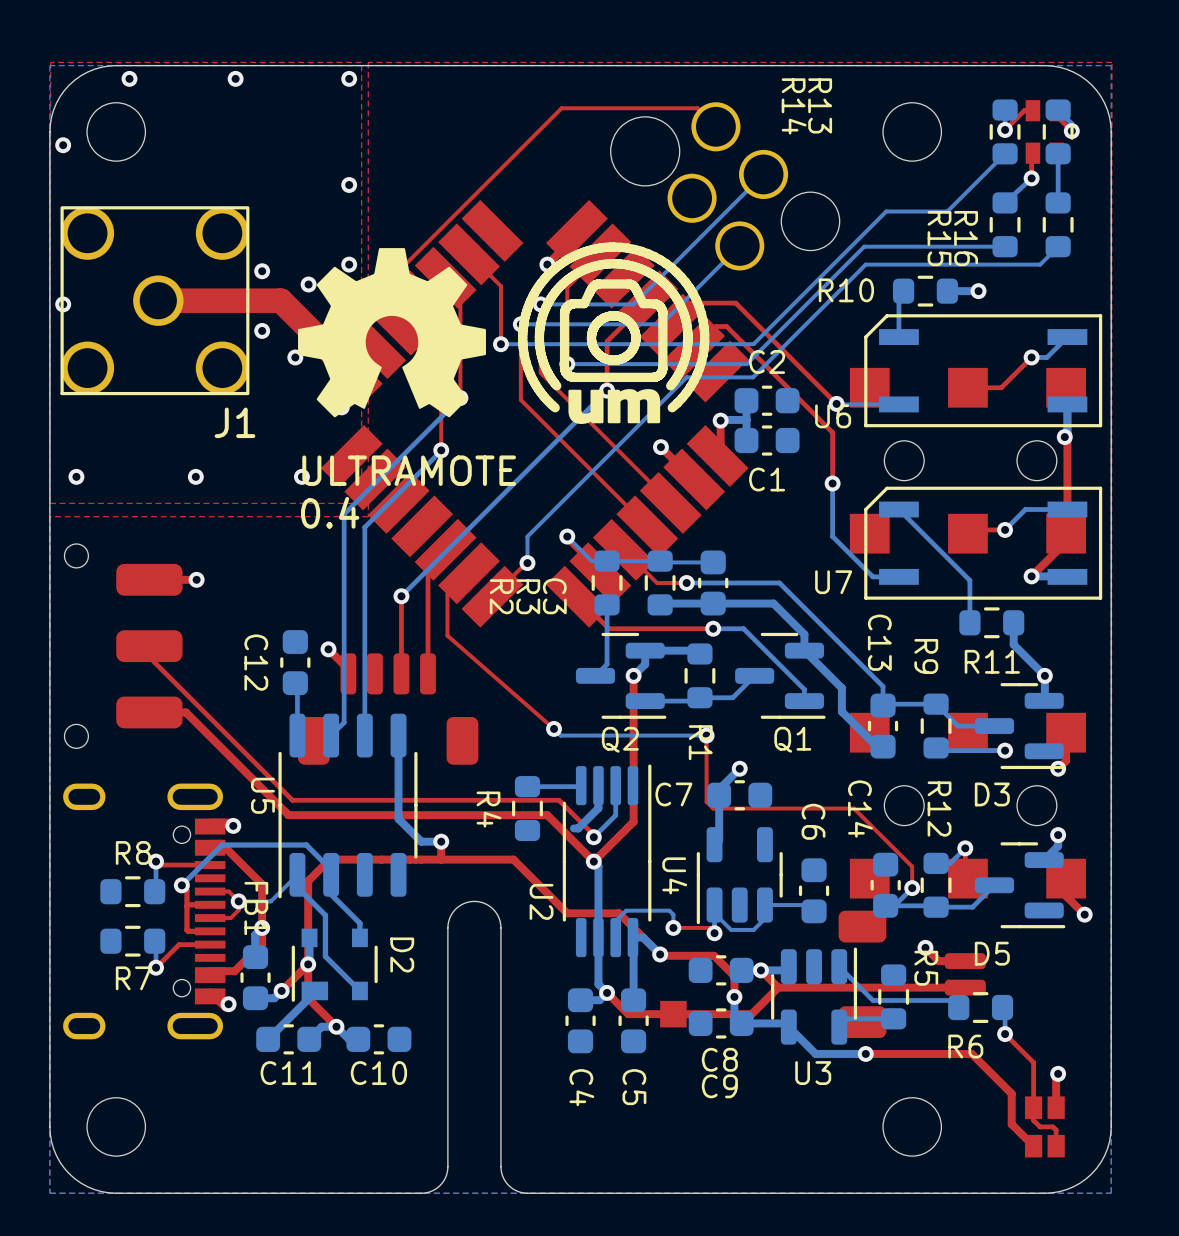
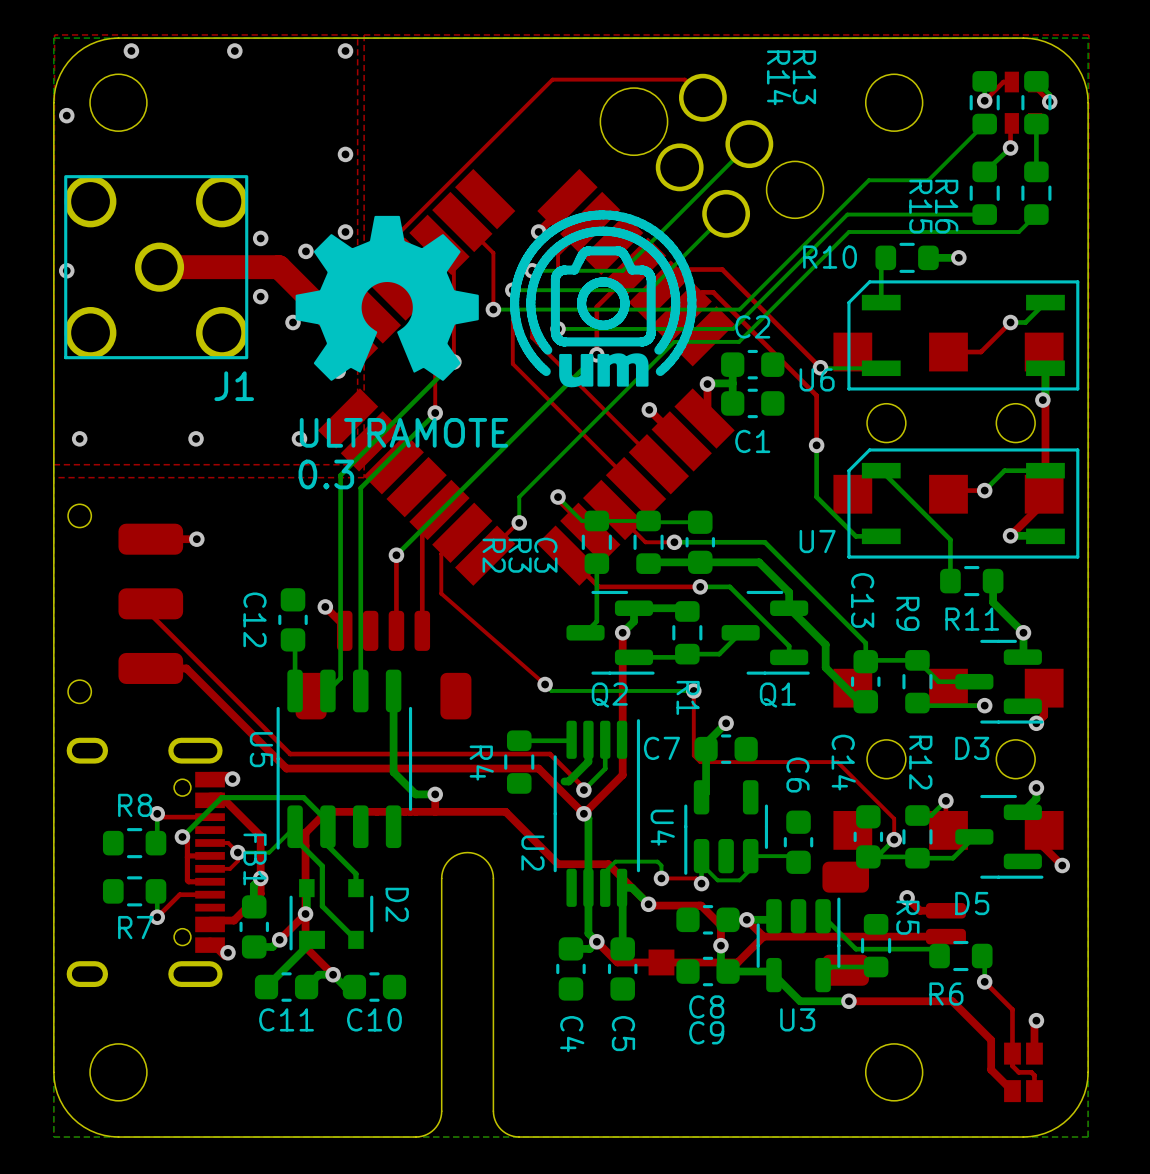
text: 0.4 (330, 512) -> 0.3 (326, 474)

